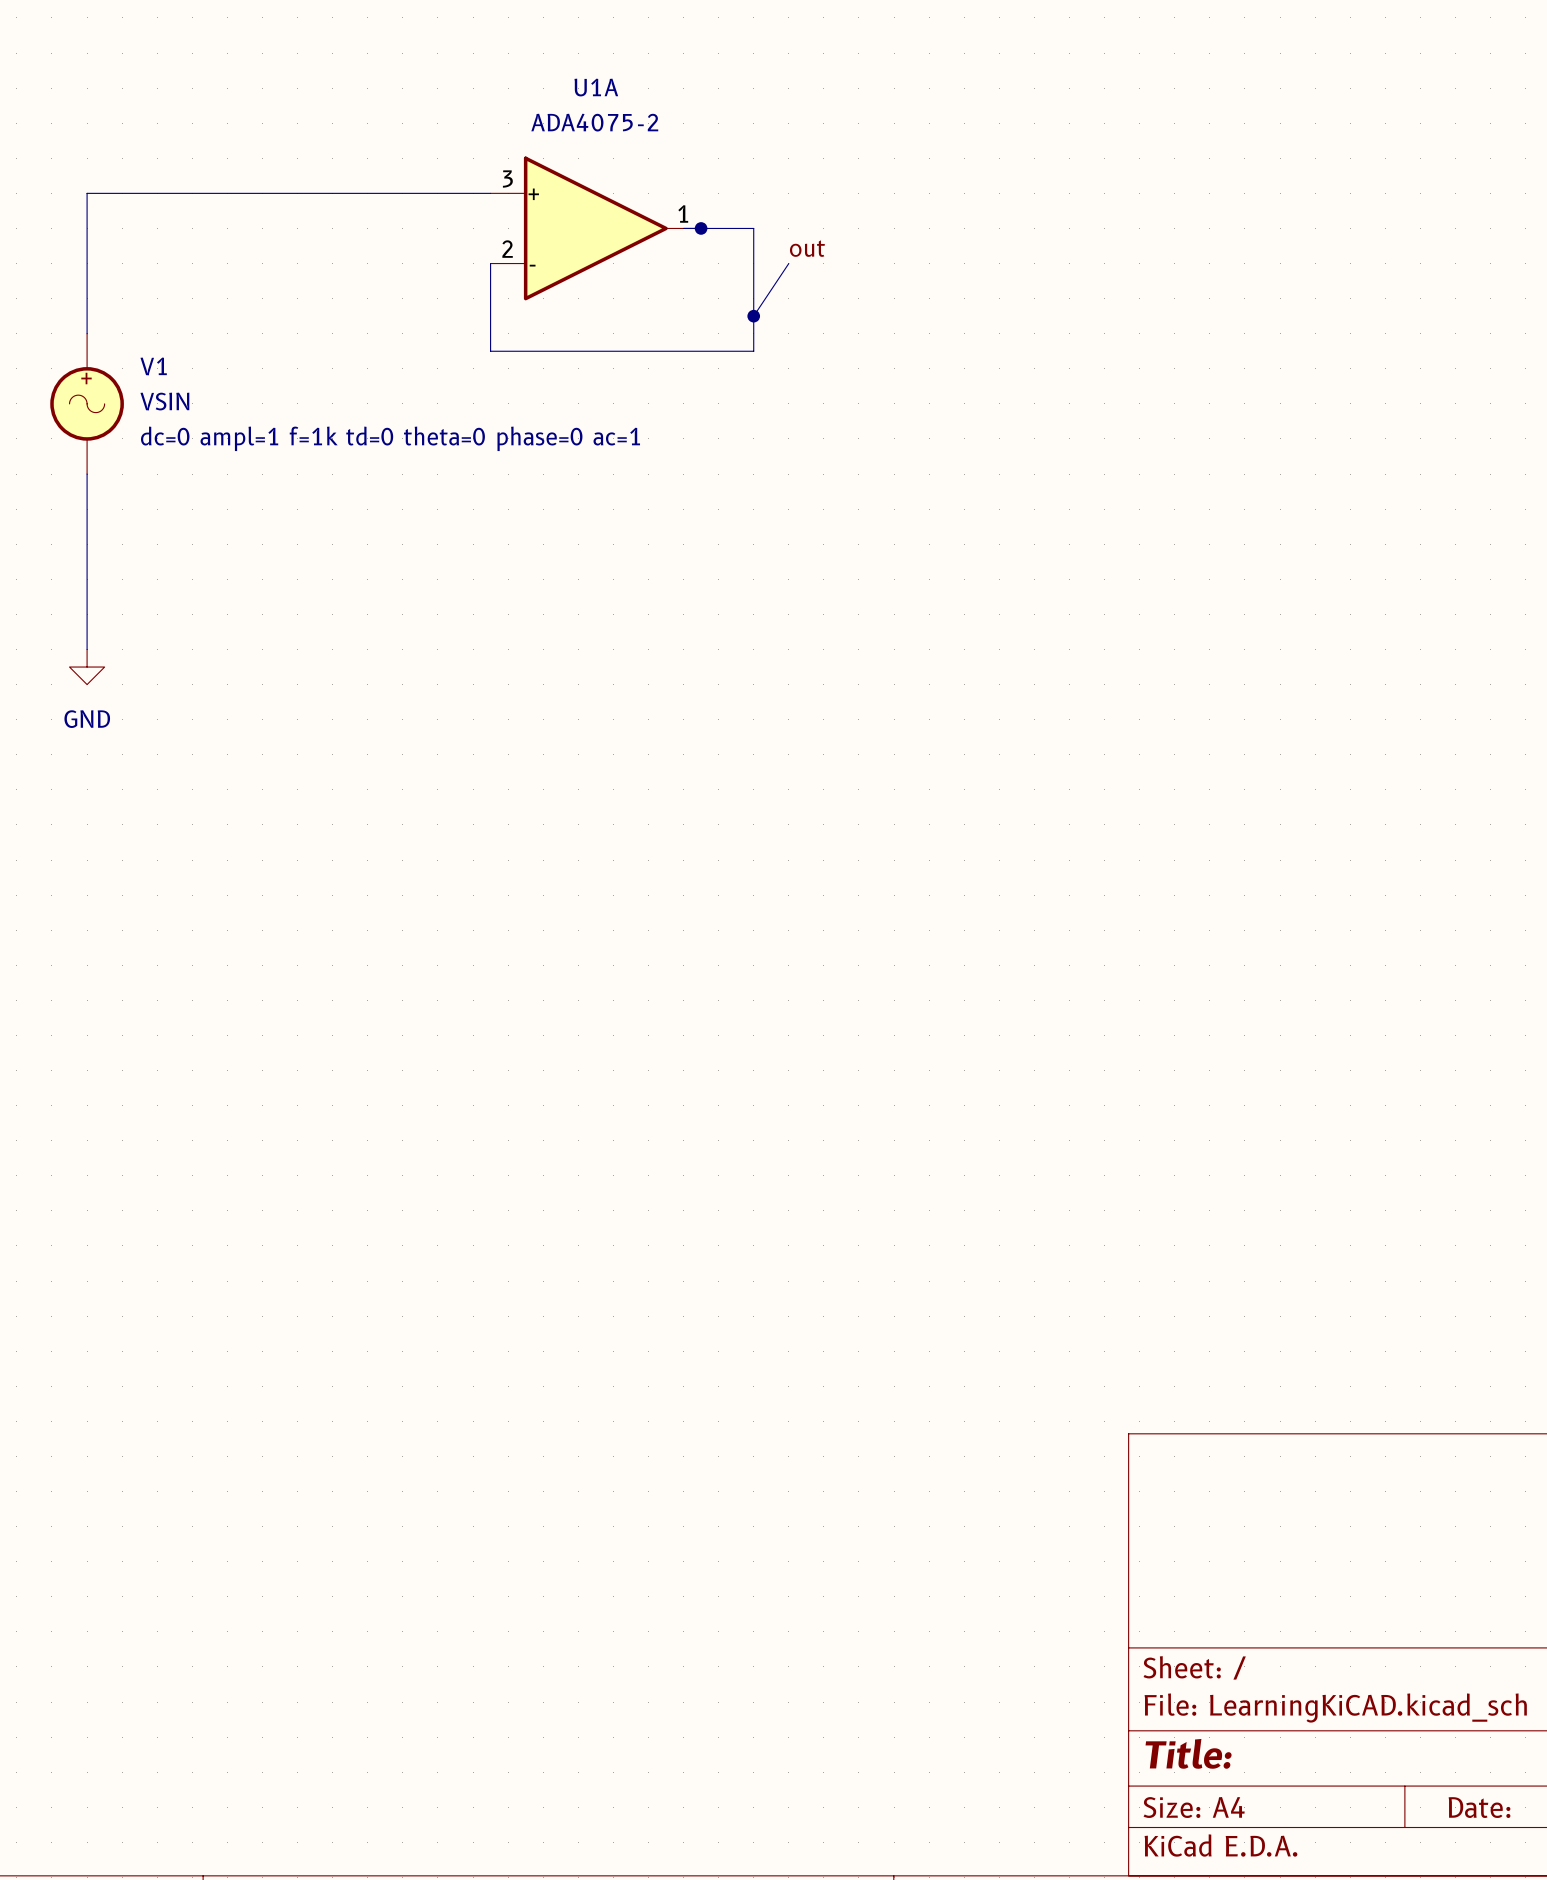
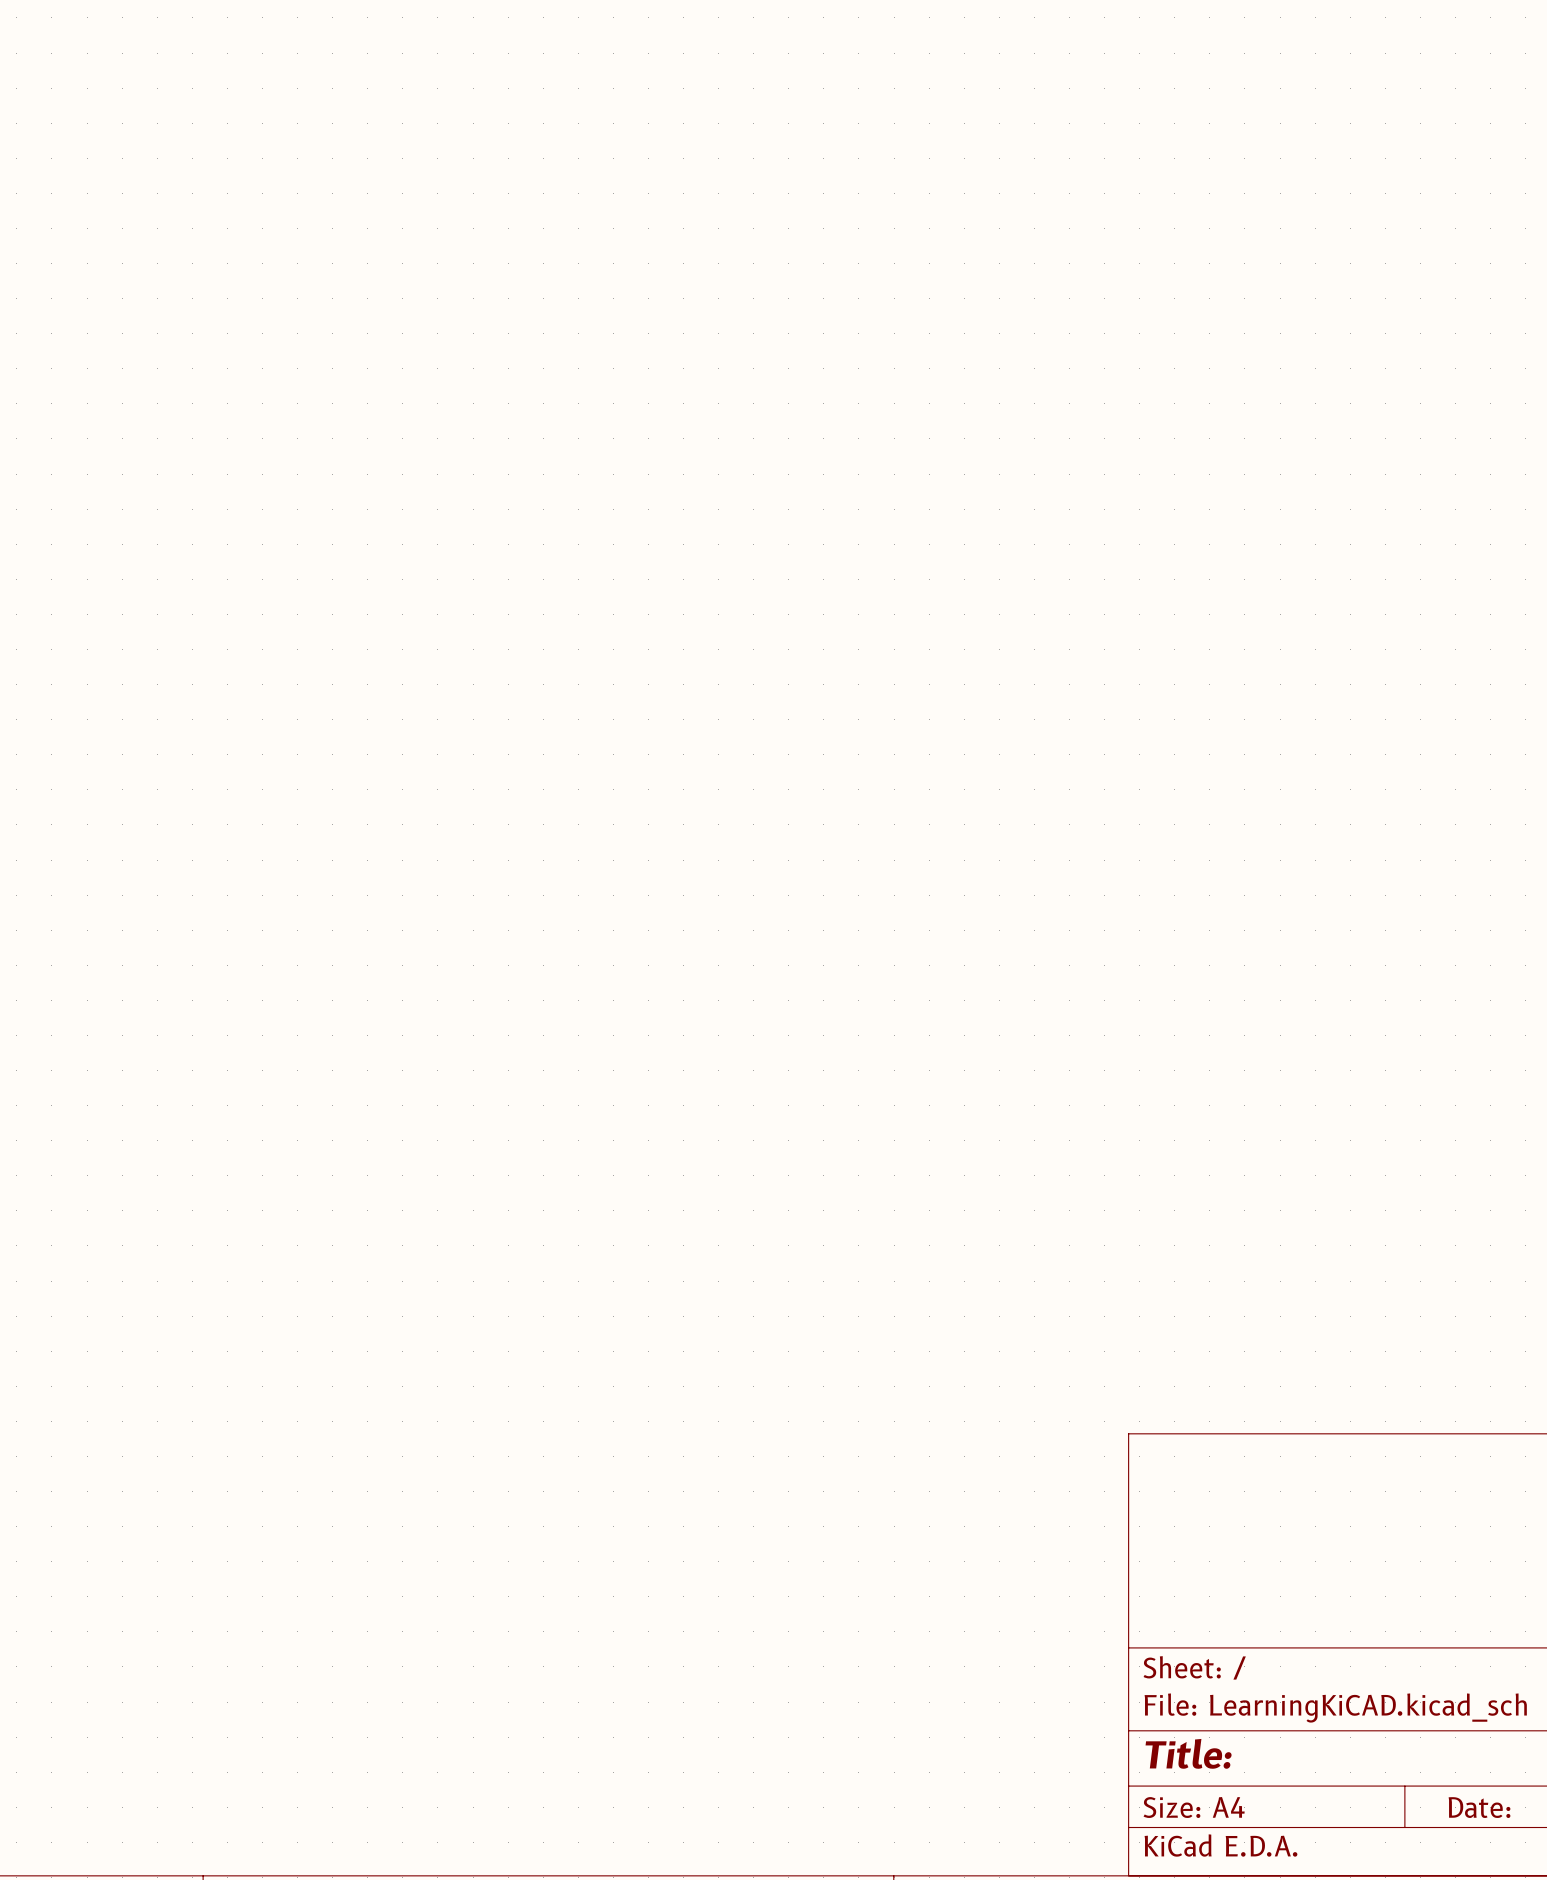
wire: (490, 193) (87, 193) (87, 333) -> none
U1A: ADA4075-2 (595, 228) -> none
wire: (683, 228) (753, 228) (753, 351) (490, 351) (490, 263) -> none
junction: (701, 228) -> none
label: out (807, 248) -> none
wire: (788, 263) (753, 316) -> none
junction: (753, 316) -> none
V1: VSIN (87, 403) -> none
wire: (87, 474) (87, 649) -> none
power symbol: GND (87, 667) -> none

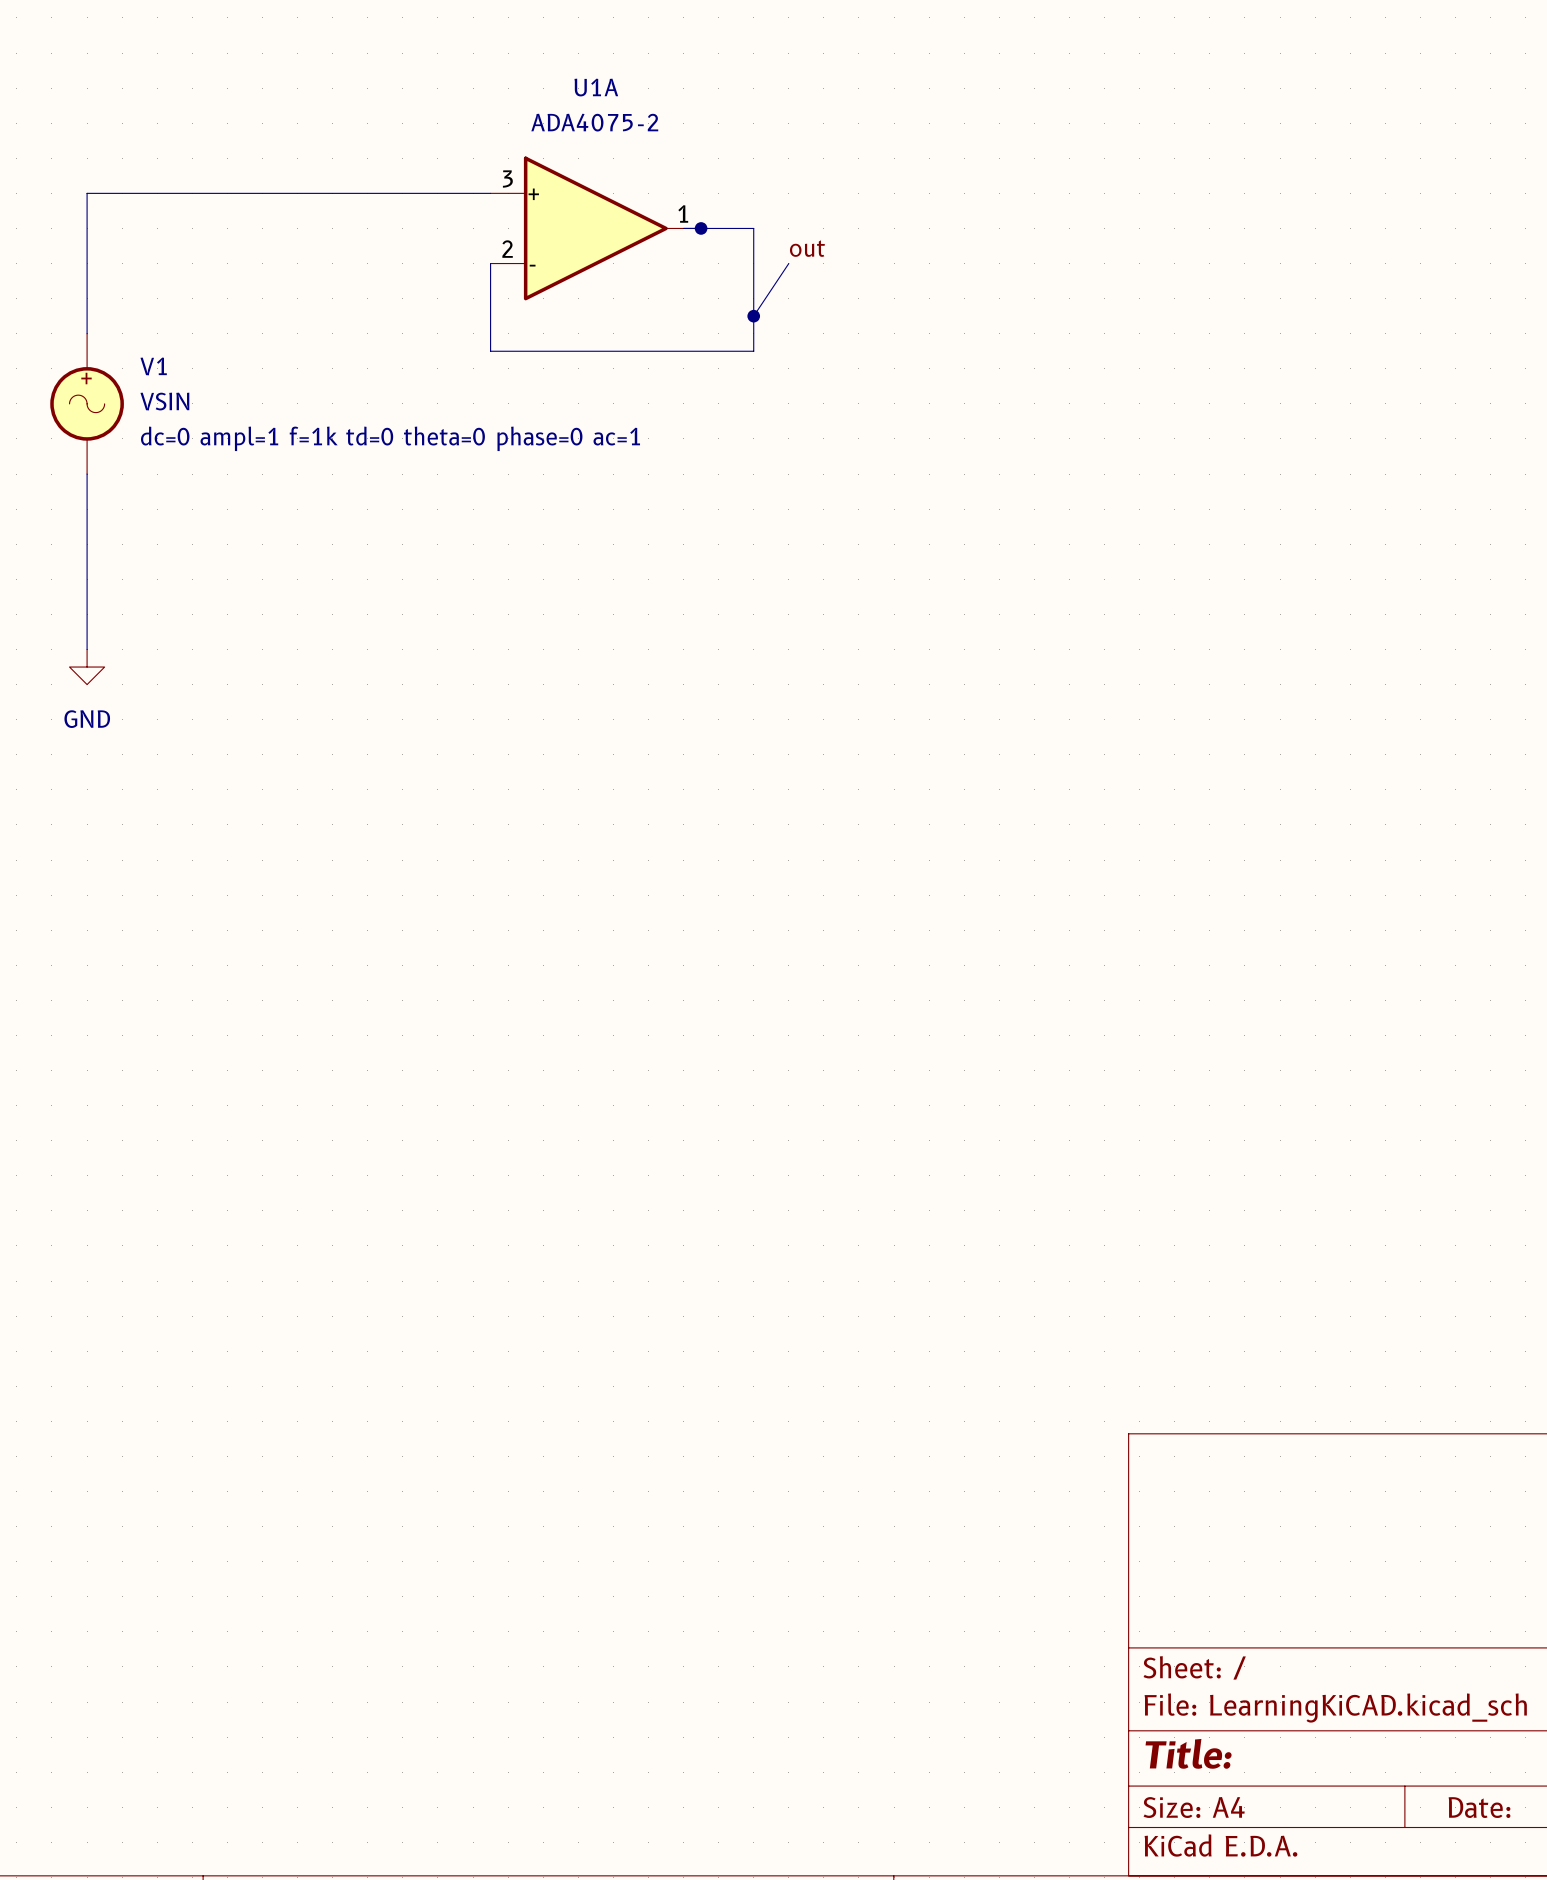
wire: none -> (490, 193) (87, 193) (87, 333)
U1A: none -> ADA4075-2 (595, 228)
wire: none -> (683, 228) (753, 228) (753, 351) (490, 351) (490, 263)
junction: none -> (701, 228)
label: none -> out (807, 248)
wire: none -> (788, 263) (753, 316)
junction: none -> (753, 316)
V1: none -> VSIN (87, 403)
wire: none -> (87, 474) (87, 649)
power symbol: none -> GND (87, 667)

